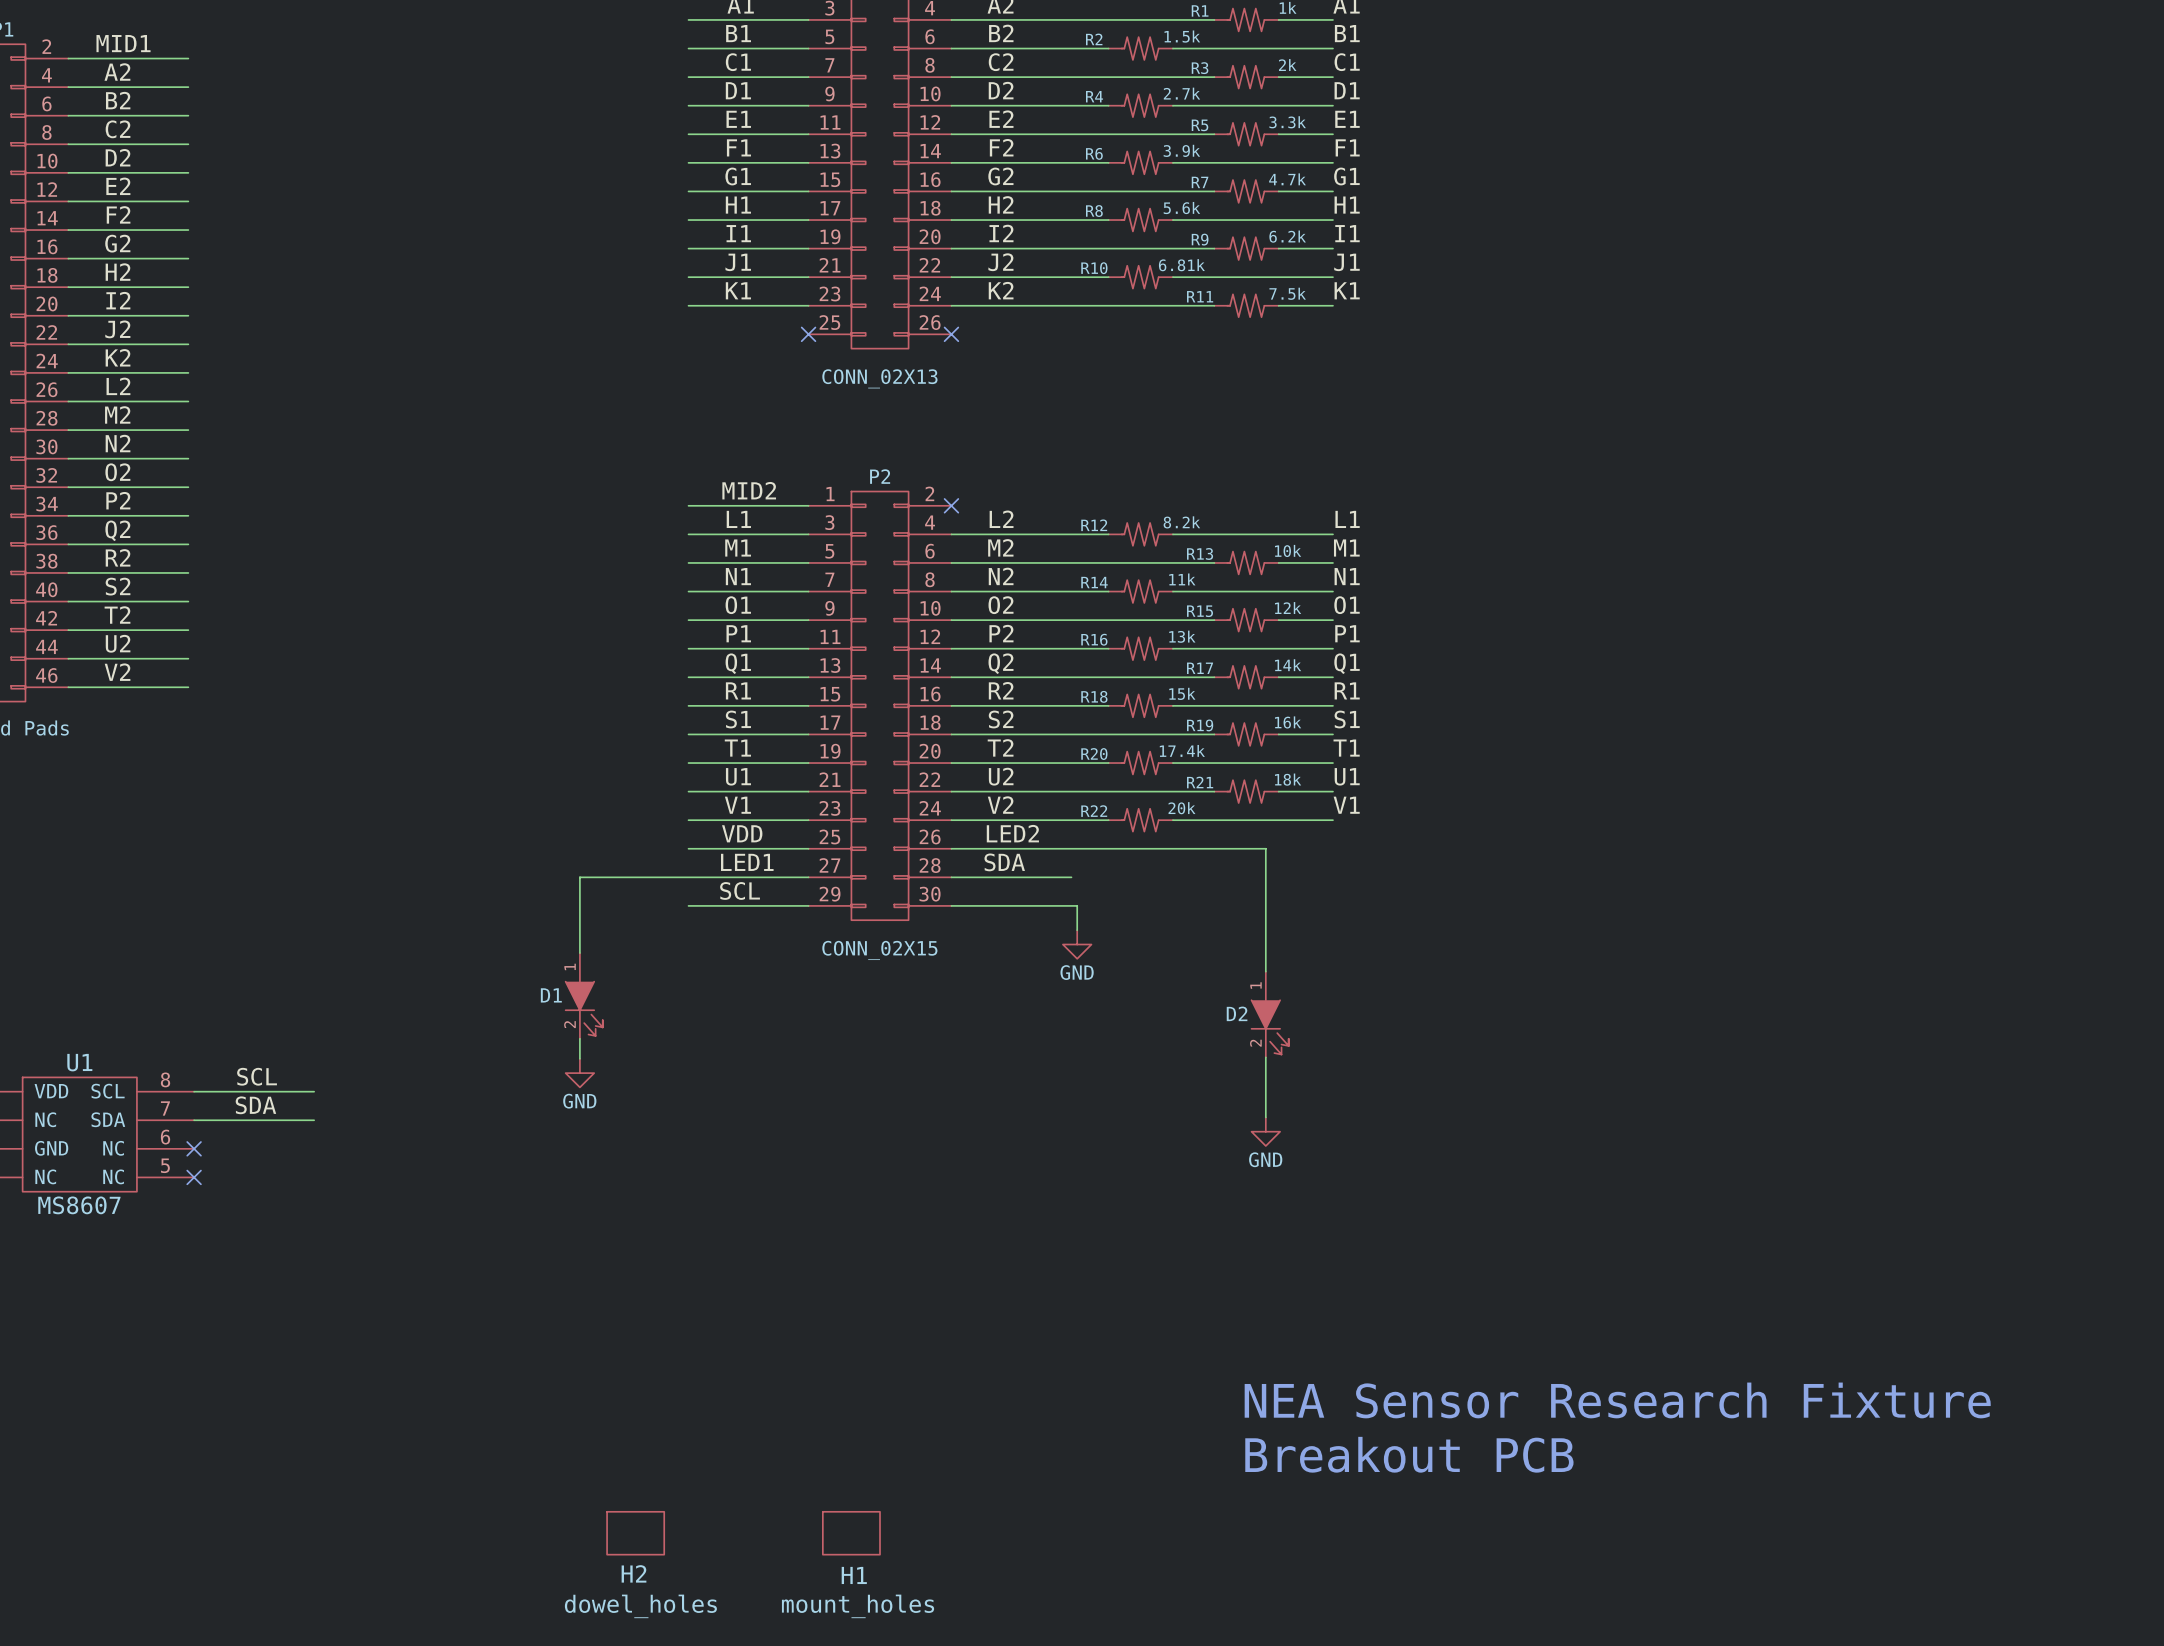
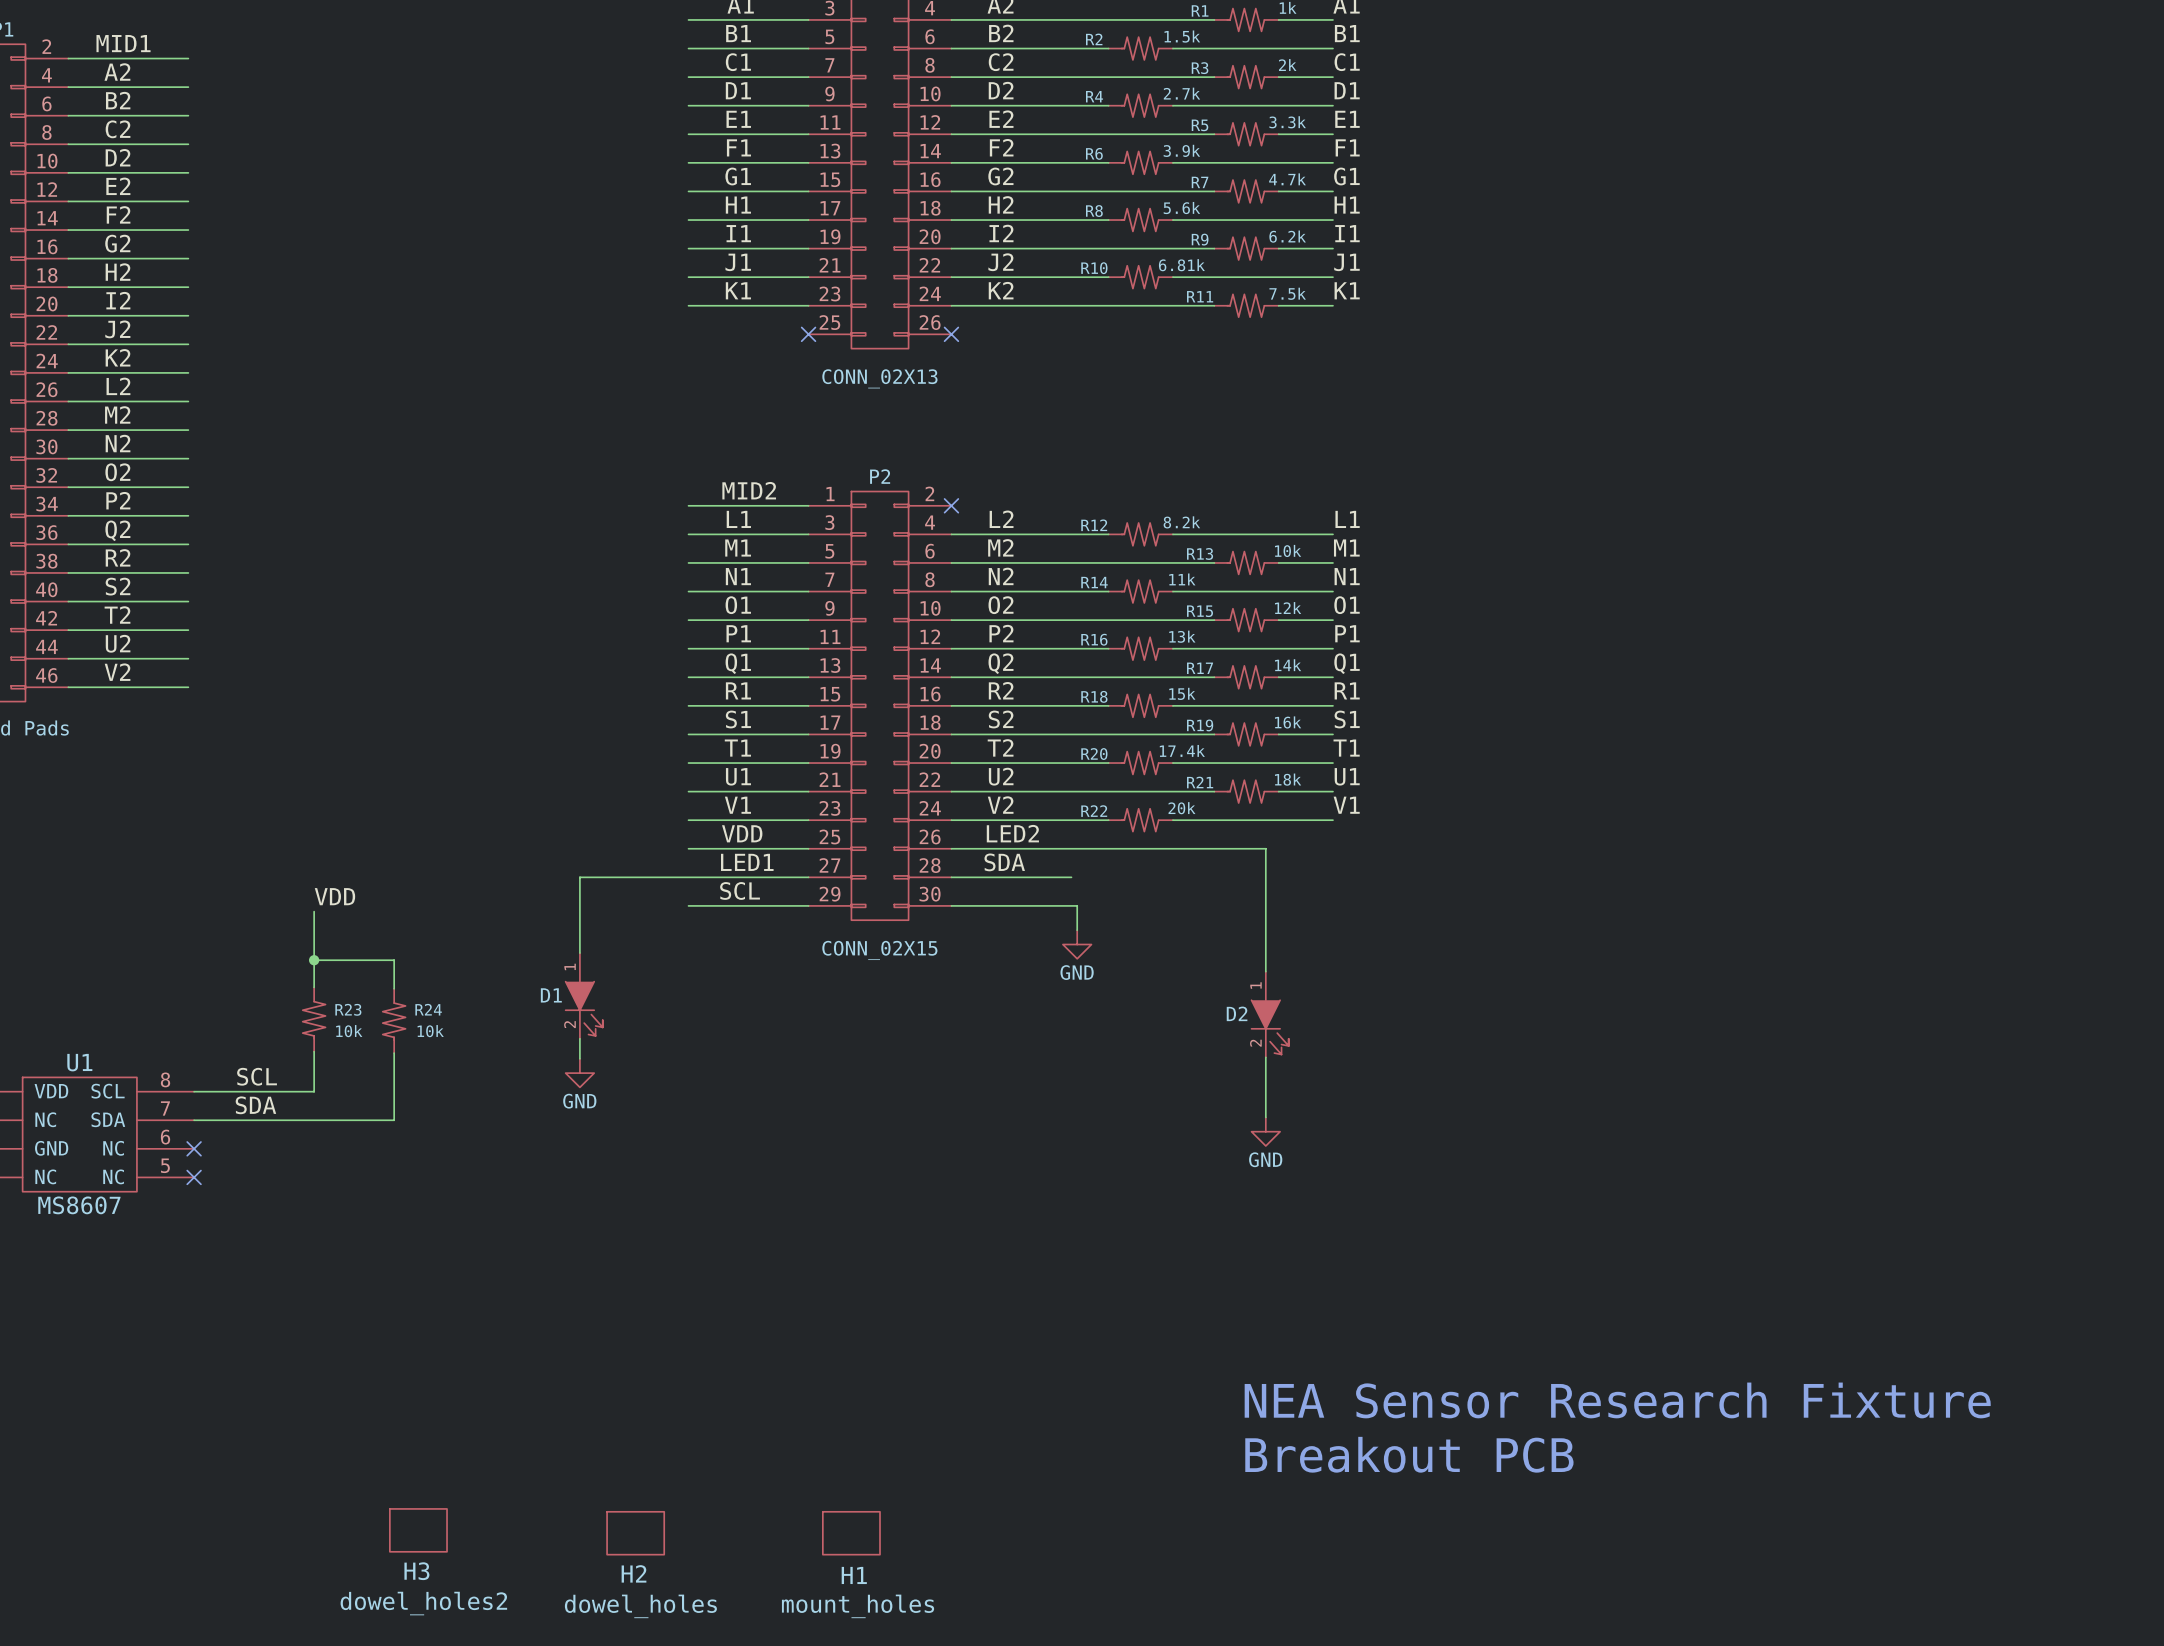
label: none -> VDD (334, 896)
wire: none -> (314, 911) (314, 987)
wire: none -> (314, 960) (394, 960) (394, 988)
junction: none -> (314, 960)
R23: none -> 10k (314, 1019)
R24: none -> 10k (394, 1020)
wire: none -> (314, 1051) (314, 1091)
wire: none -> (394, 1053) (394, 1120) (314, 1120)
H3: none -> dowel_holes2 (418, 1530)

